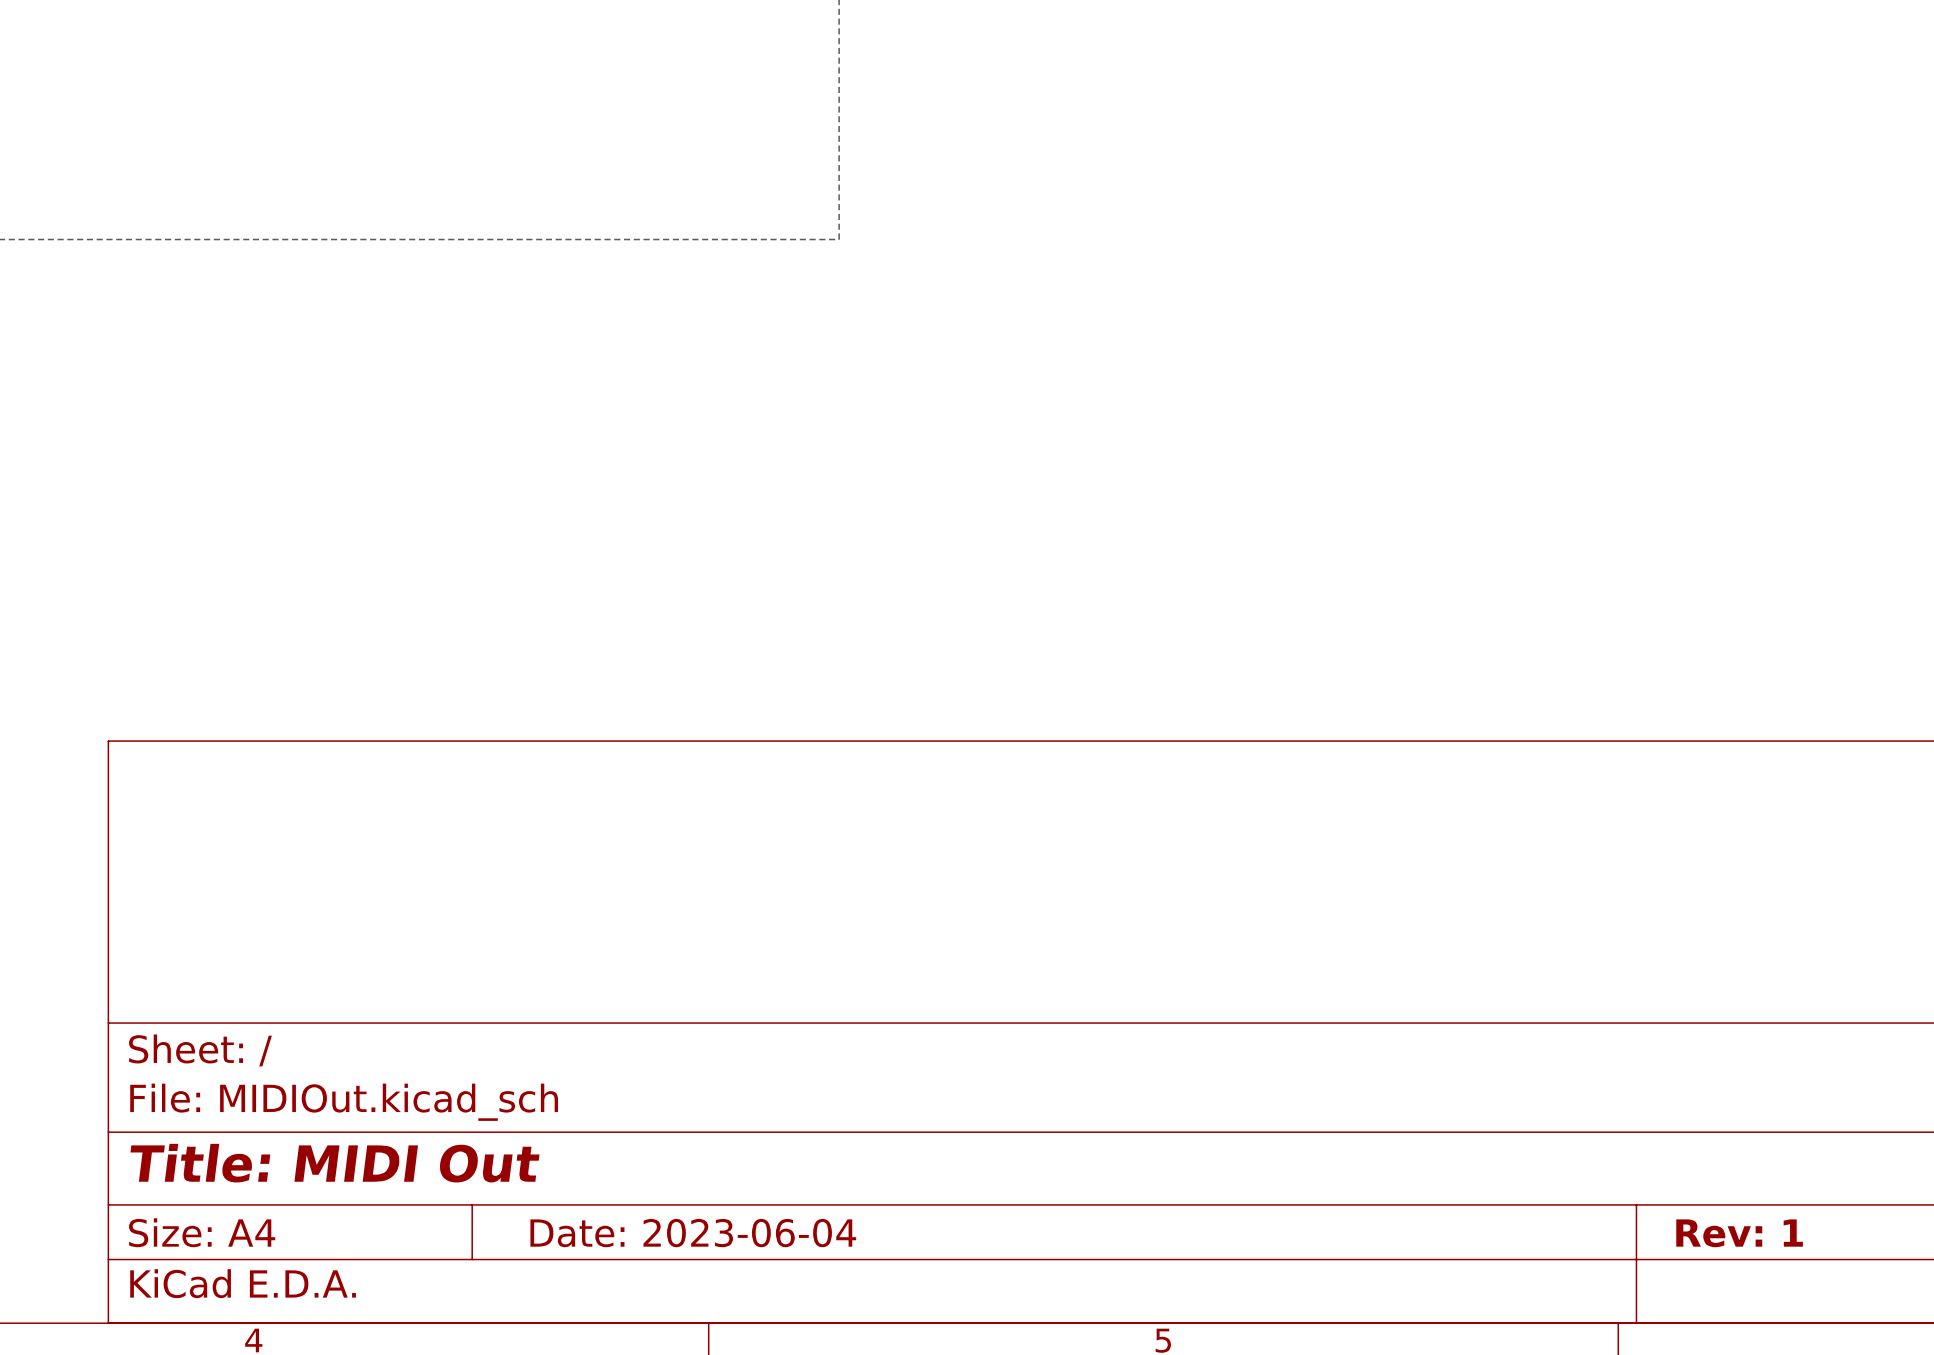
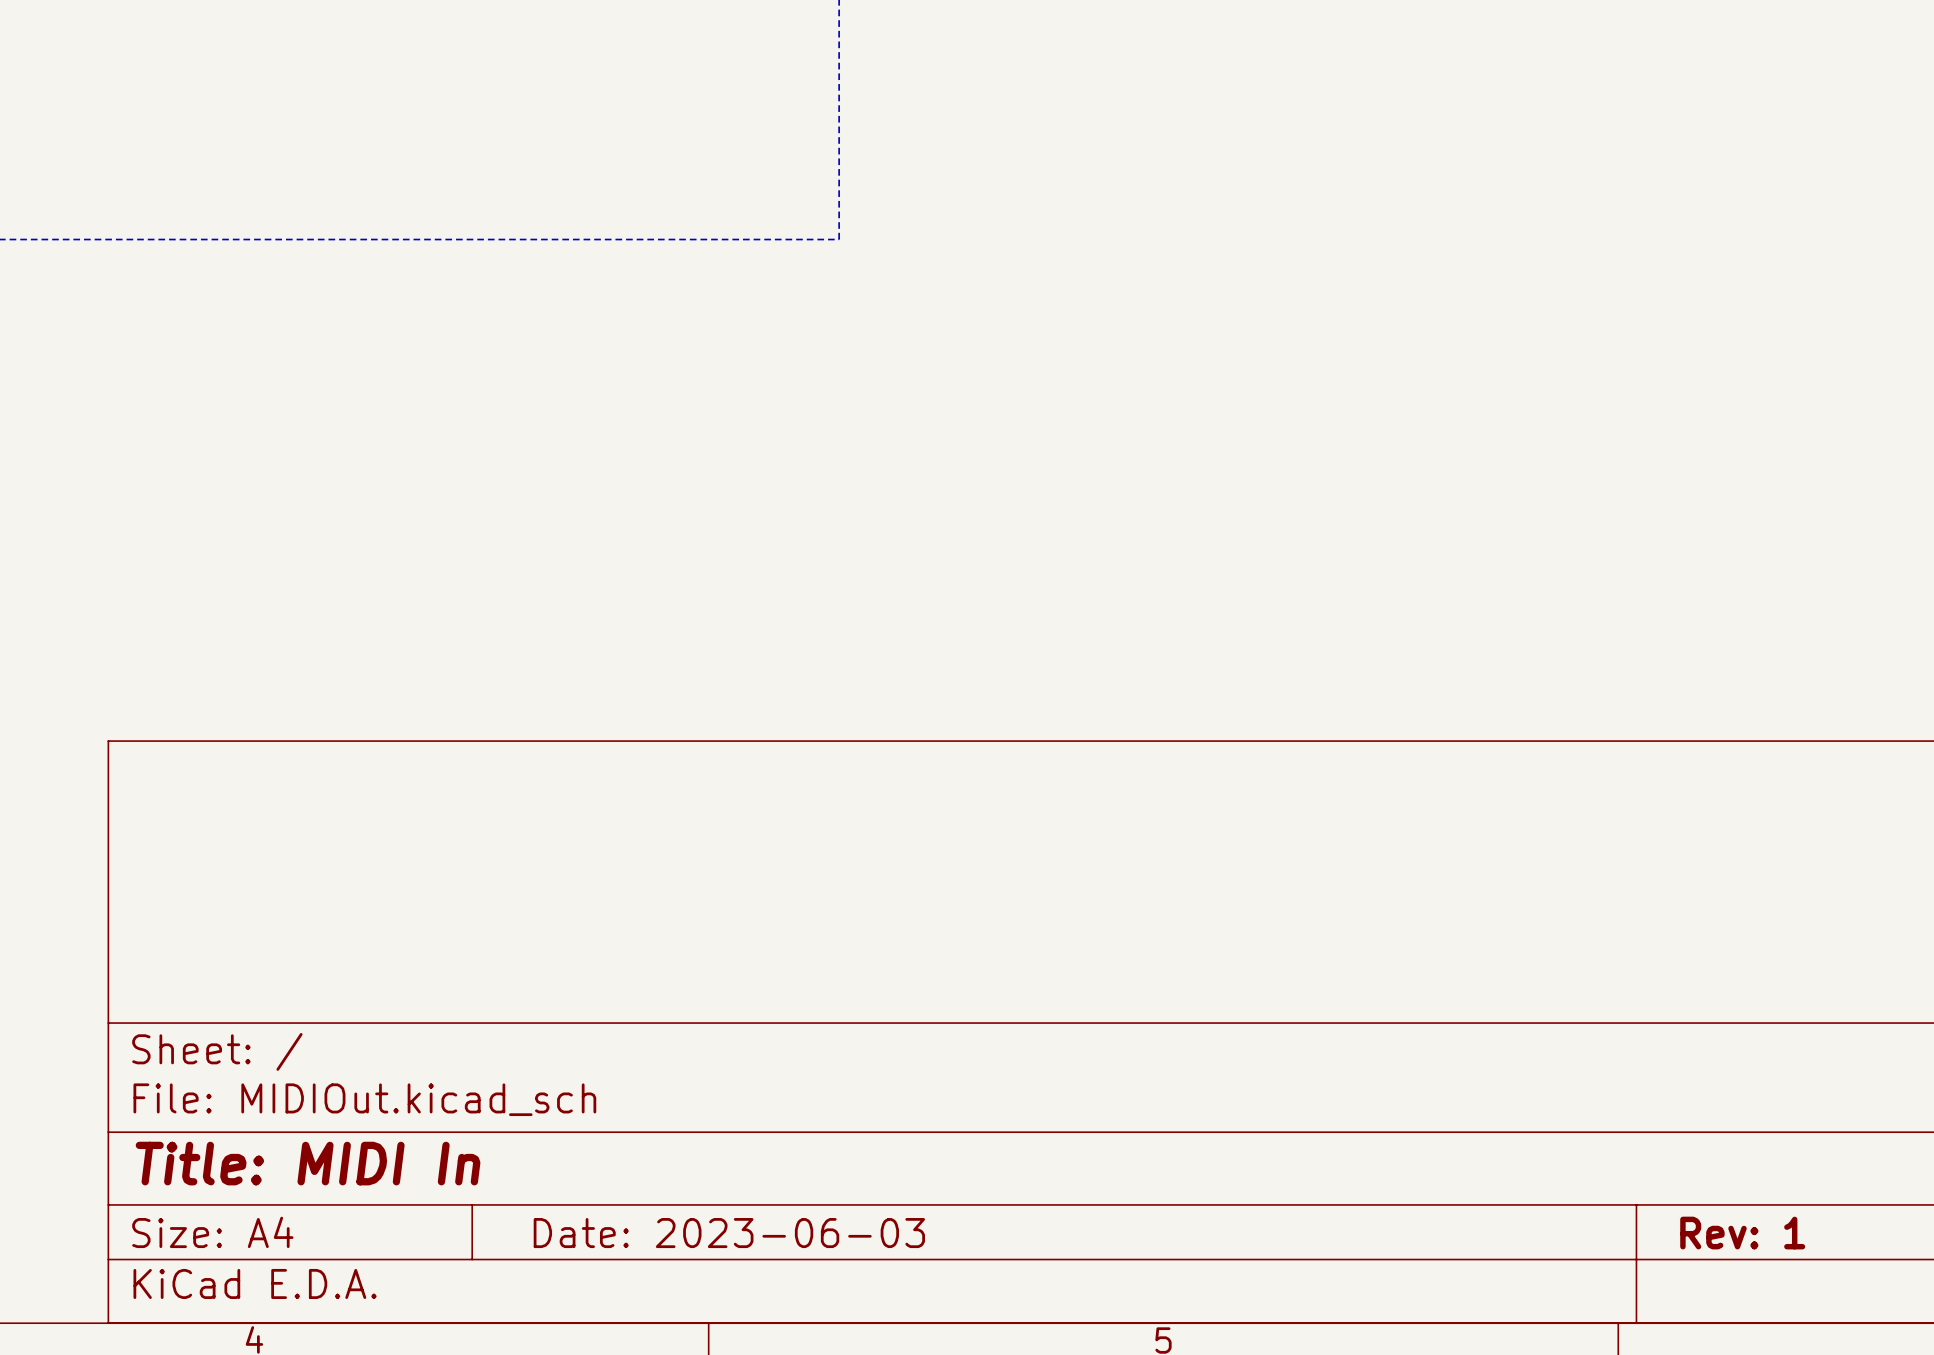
title block: Title: MIDI Out (334, 1163) -> Title: MIDI In (308, 1163)
title block: Date: 2023-06-04 (693, 1233) -> Date: 2023-06-03 (729, 1233)

